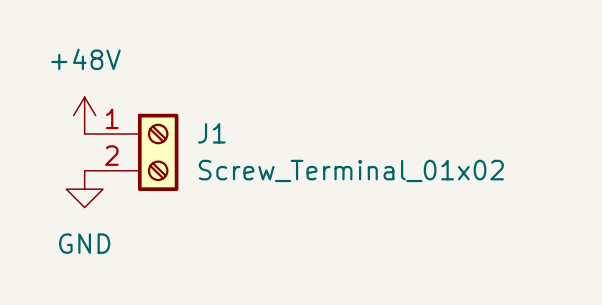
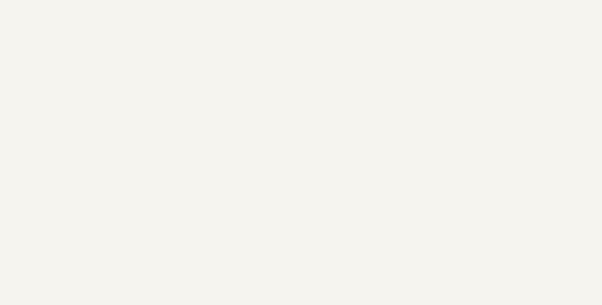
power symbol: +48V (84, 115) -> none
J1: Screw_Terminal_01x02 (131, 152) -> none
power symbol: GND (84, 189) -> none

